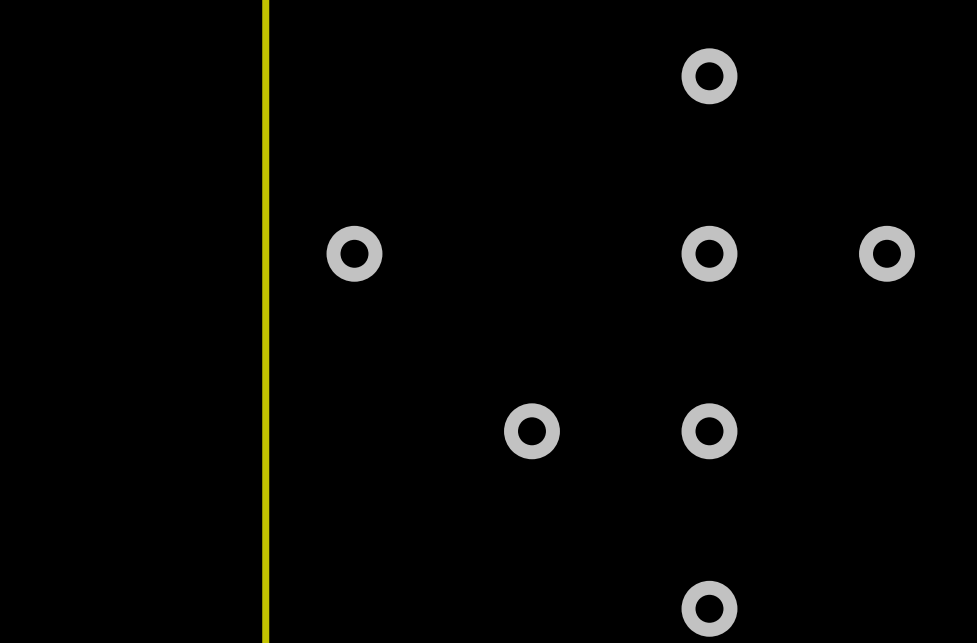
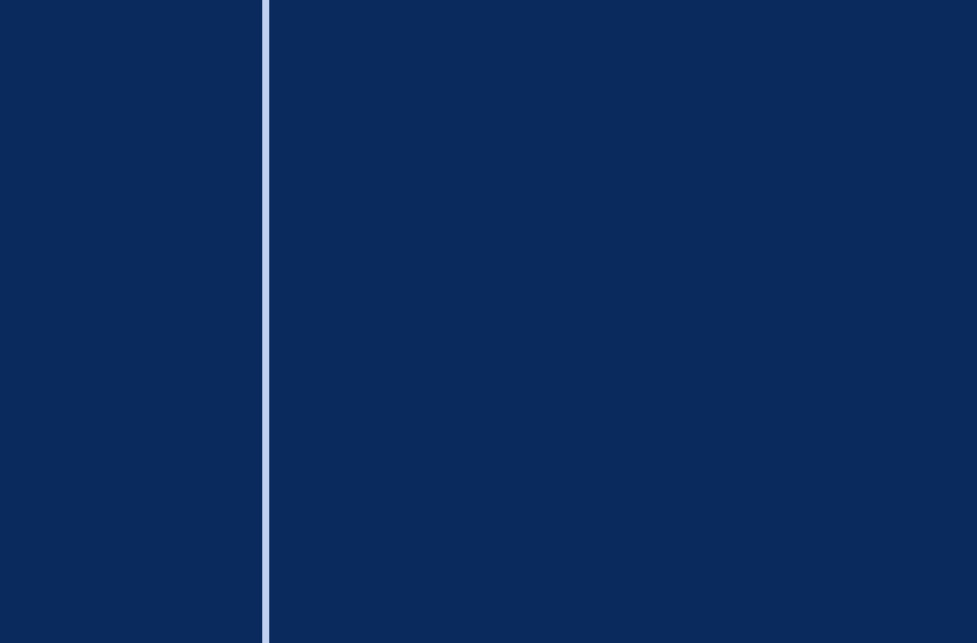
via: (709, 76) -> none
via: (354, 253) -> none
via: (709, 253) -> none
via: (886, 253) -> none
via: (531, 431) -> none
via: (709, 431) -> none
via: (709, 608) -> none

